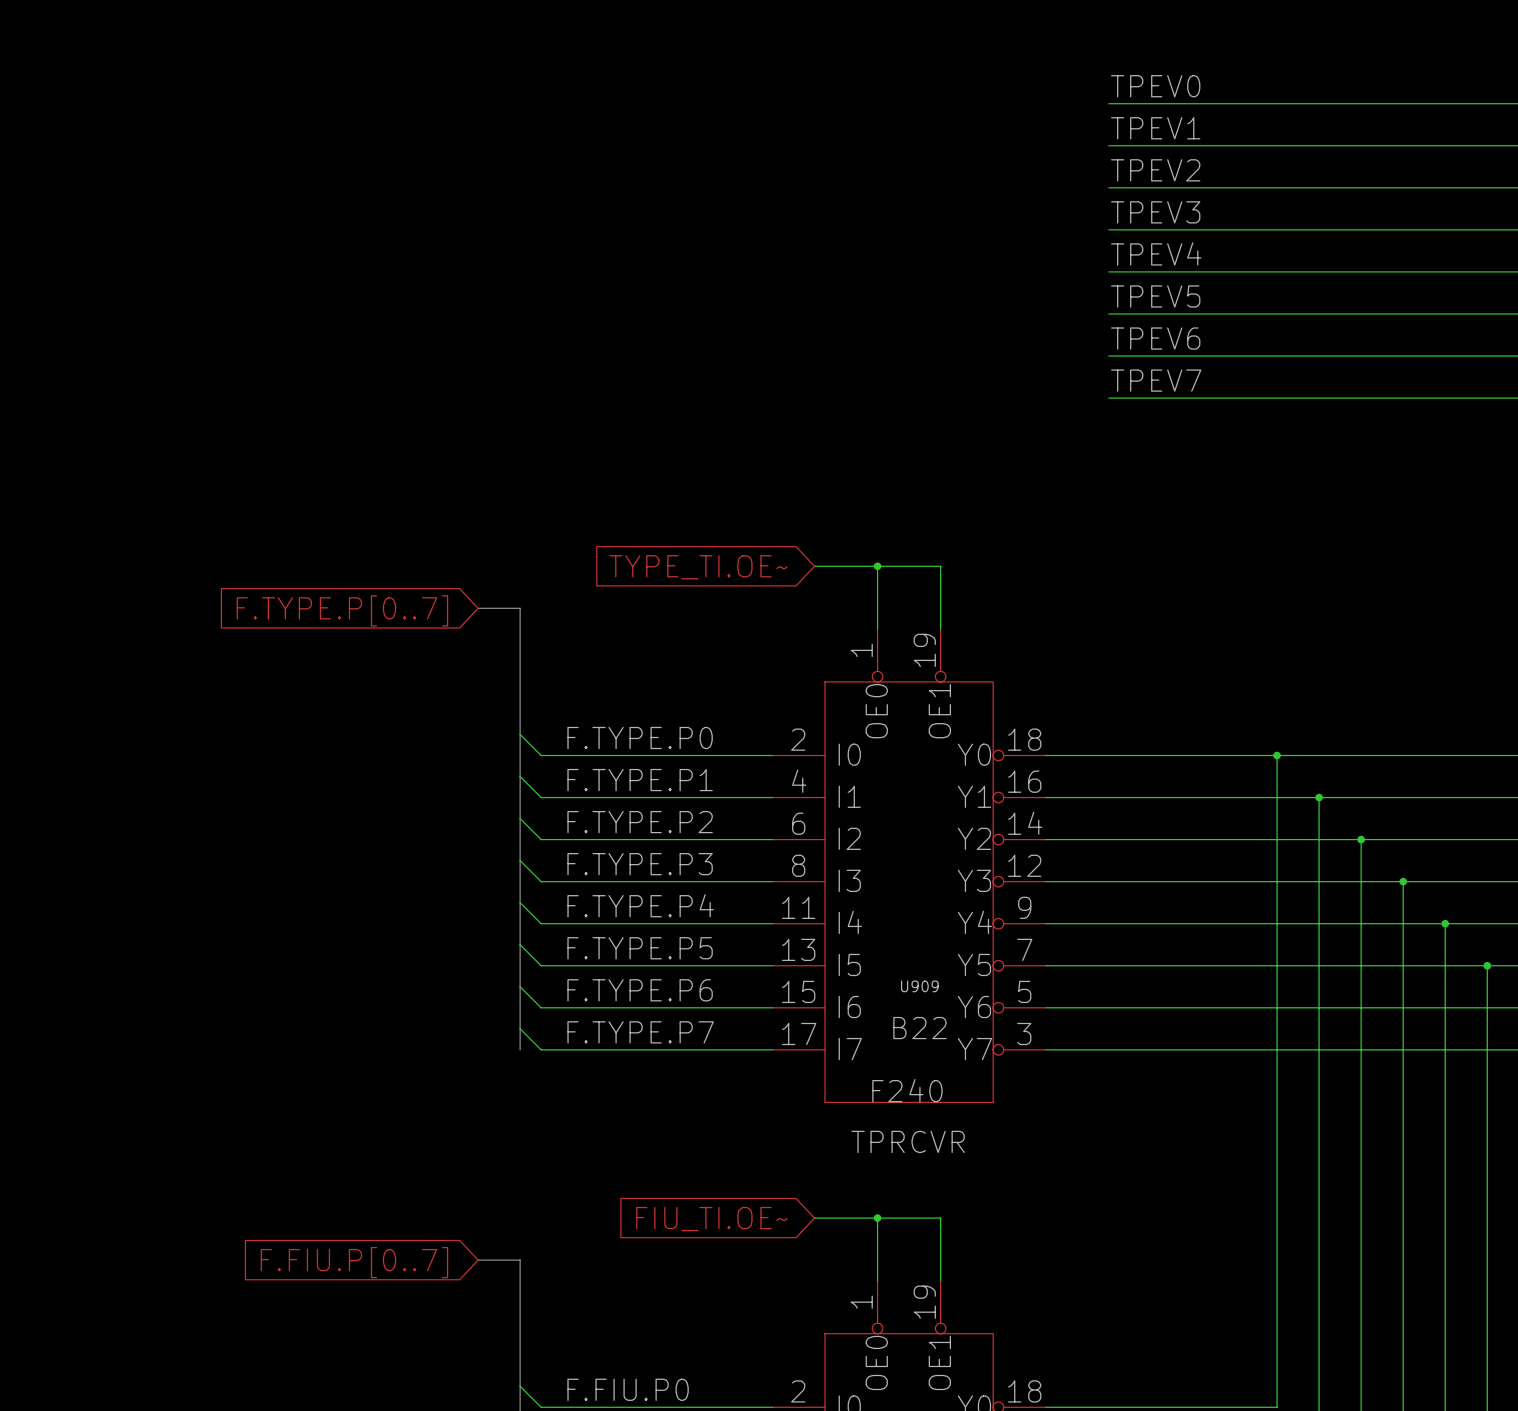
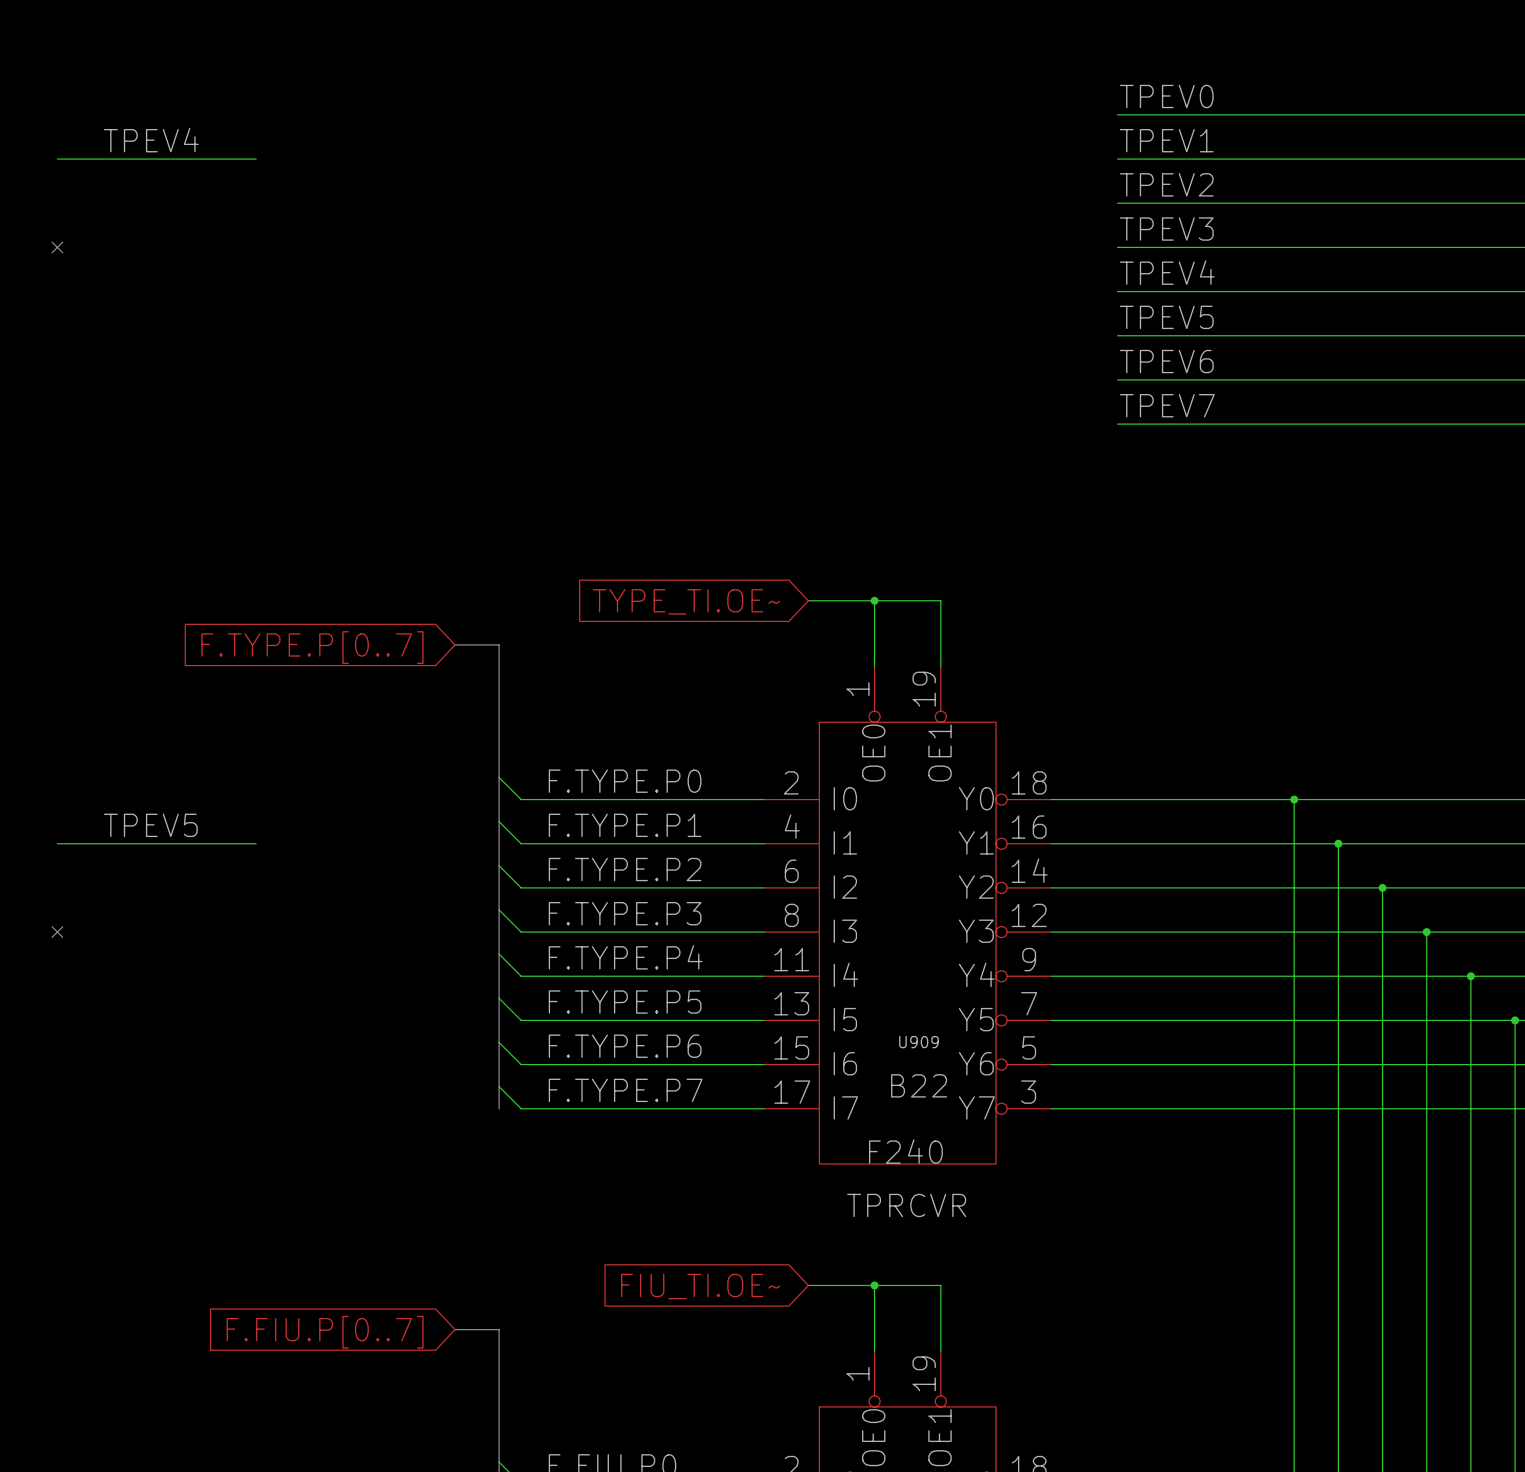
label: none -> TPEV4 (151, 140)
wire: none -> (57, 159) (256, 159)
no-connect mark: none -> (57, 247)
label: none -> TPEV5 (150, 825)
wire: none -> (57, 843) (256, 843)
no-connect mark: none -> (57, 932)

